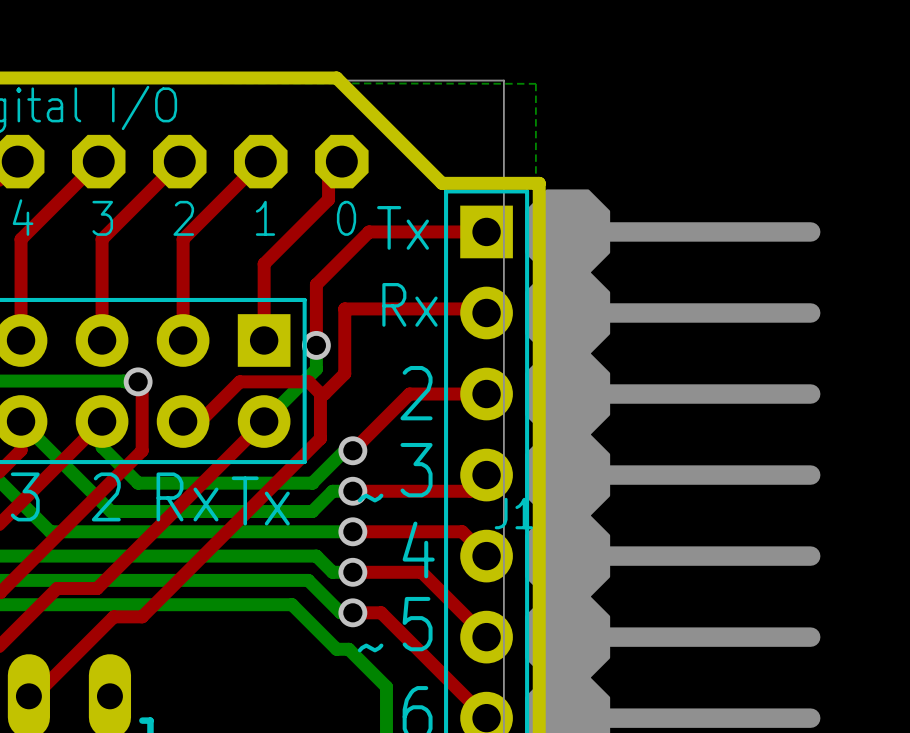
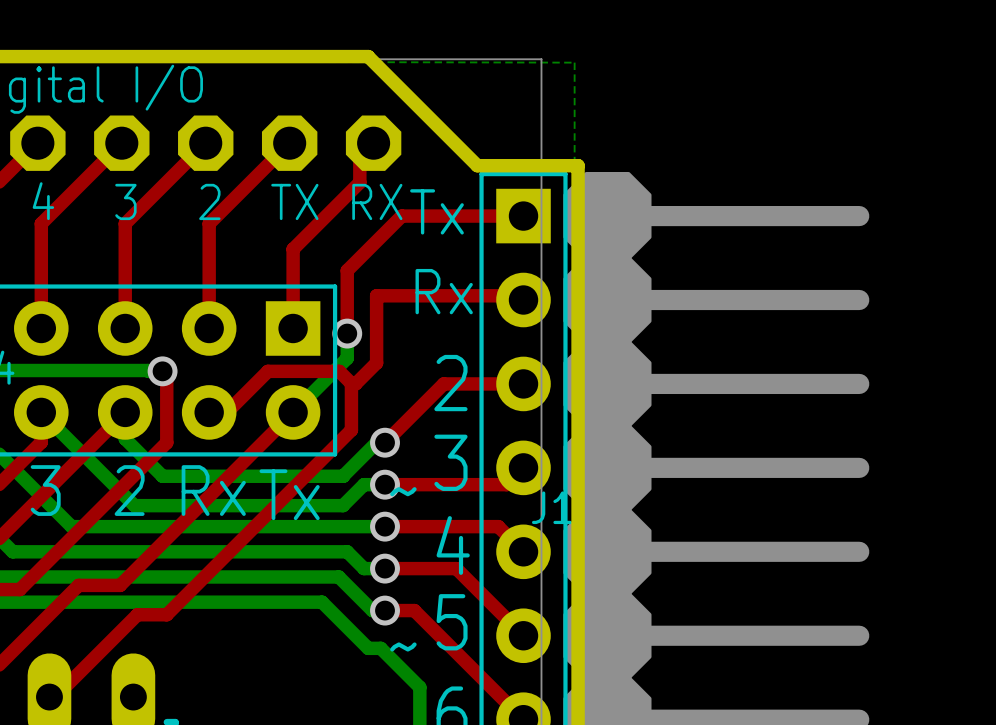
part text: 1 (265, 218) -> none
part text: none -> TX (294, 201)
part text: none -> RX (377, 201)
part text: 0 (346, 218) -> none

